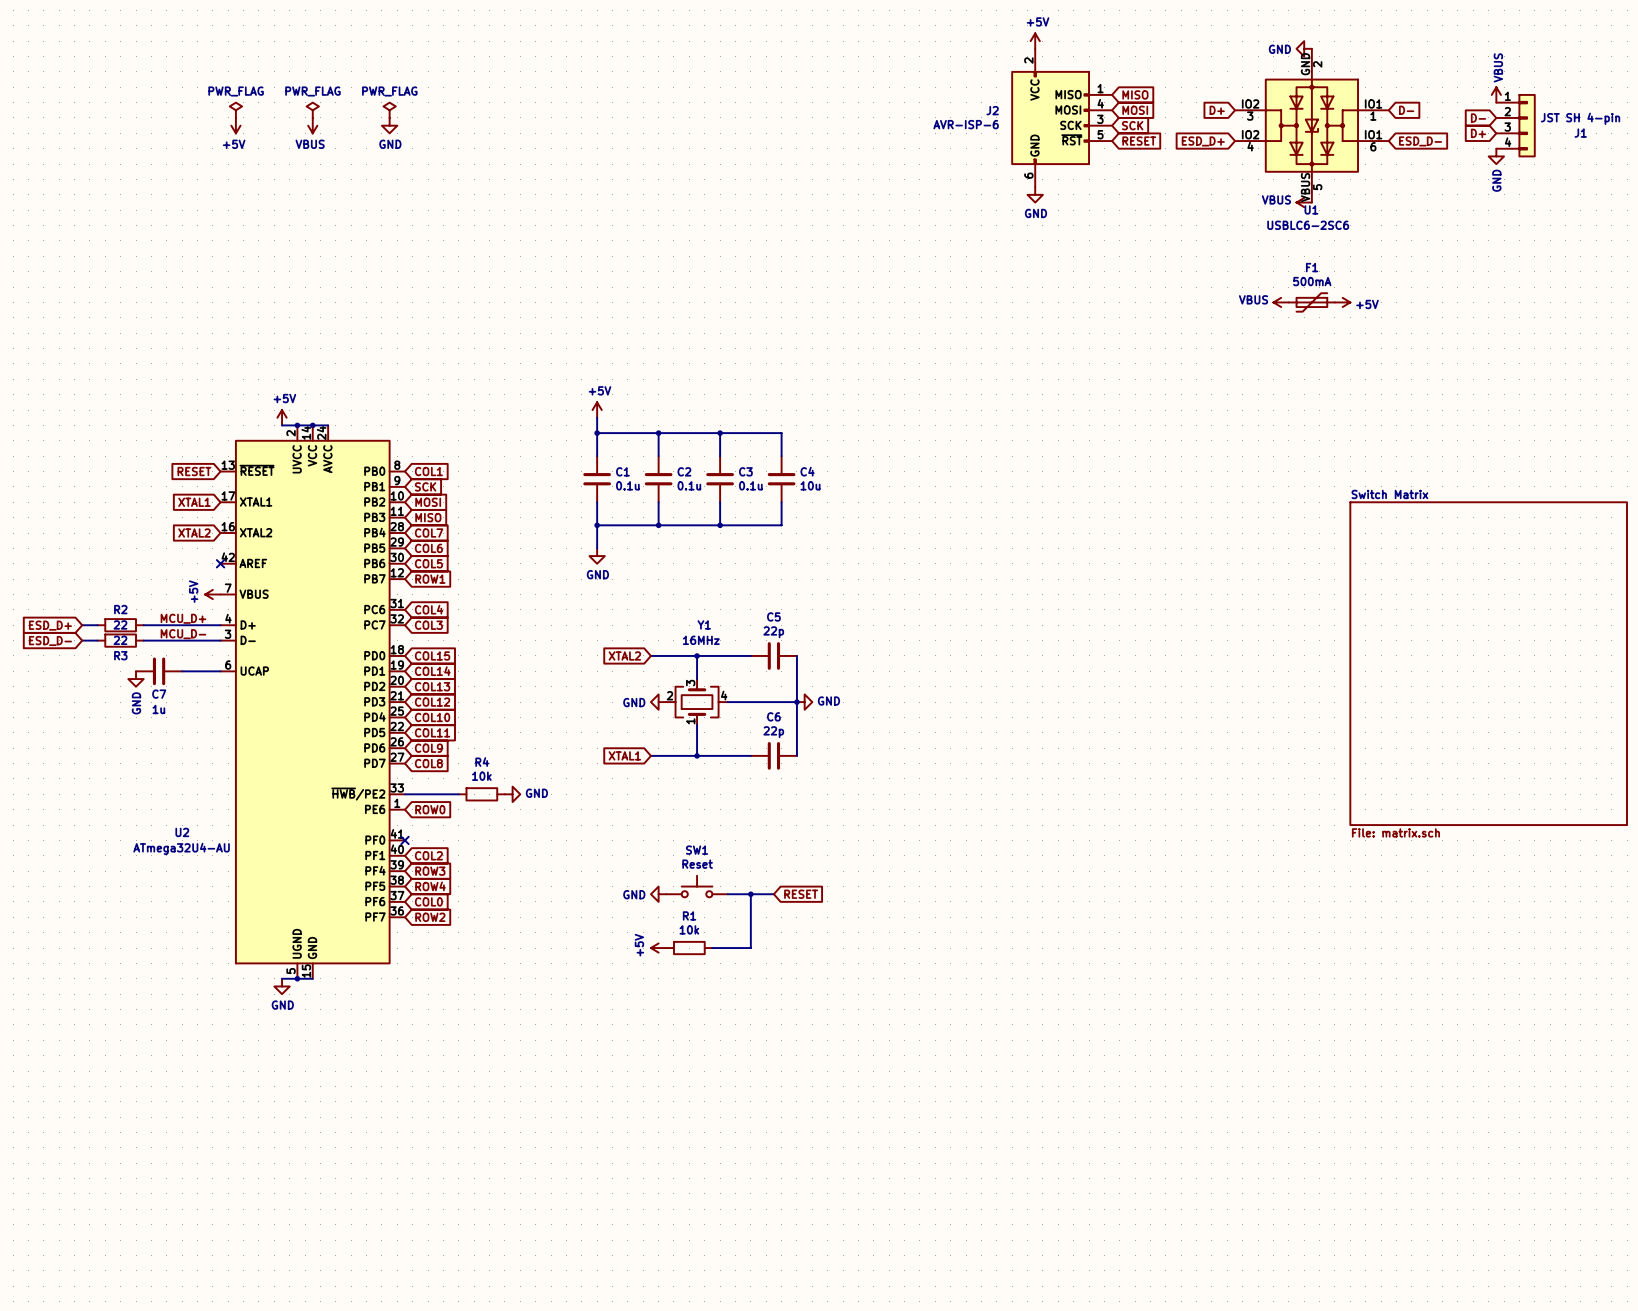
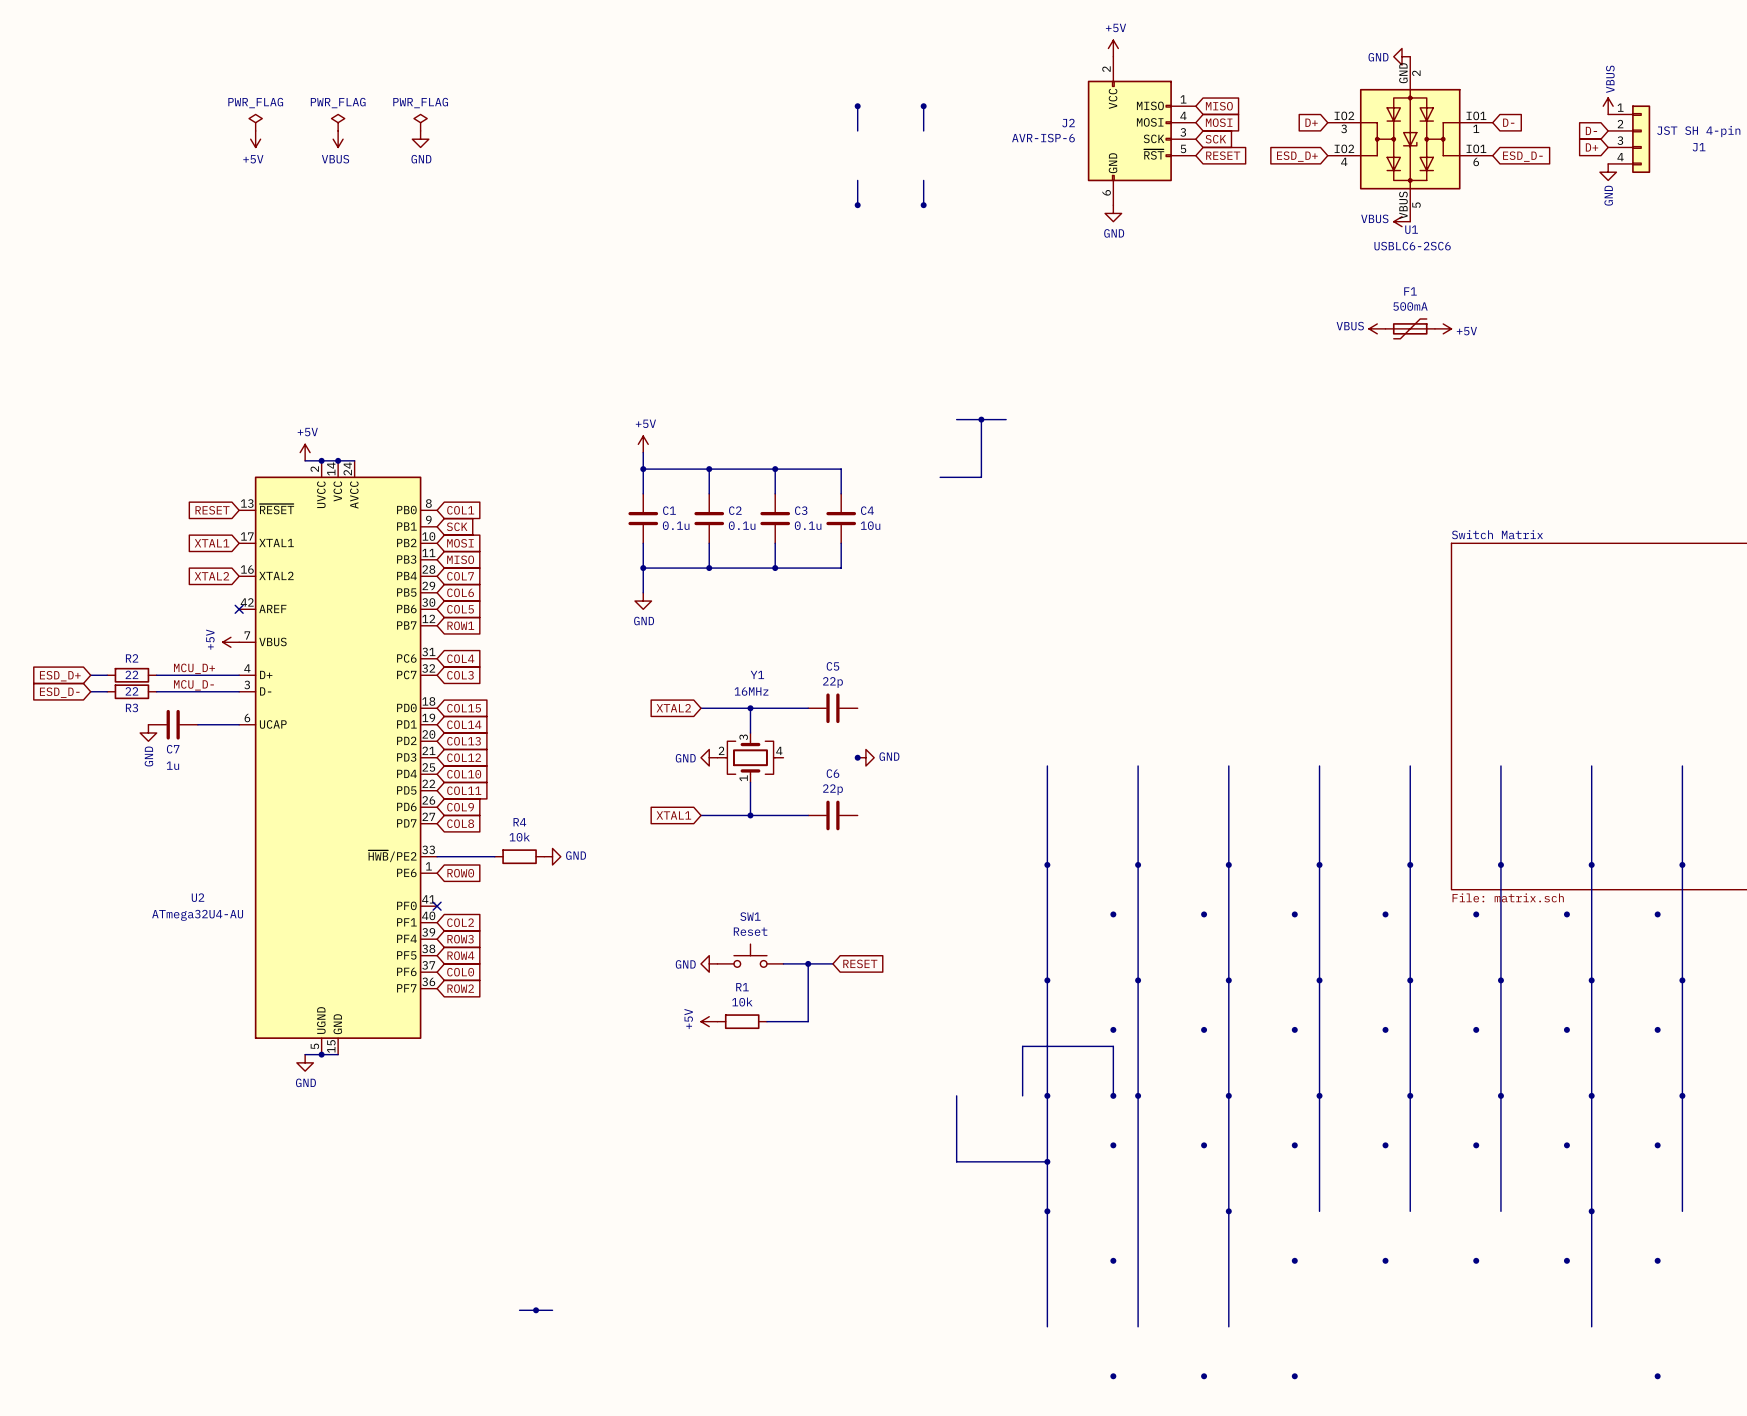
wire: none -> (857, 106) (857, 130)
junction: none -> (857, 106)
wire: none -> (923, 106) (923, 130)
junction: none -> (923, 106)
wire: none -> (857, 180) (857, 205)
wire: none -> (923, 180) (923, 205)
junction: none -> (857, 205)
junction: none -> (923, 205)
wire: none -> (956, 419) (1006, 419)
wire: none -> (981, 419) (981, 477) (940, 477)
junction: none -> (981, 419)
wire: (796, 655) (796, 755) -> none
wire: (727, 702) (796, 702) -> none
wire: none -> (1047, 765) (1047, 1326)
wire: none -> (1138, 765) (1138, 1326)
wire: none -> (1228, 765) (1228, 1326)
wire: none -> (1319, 765) (1319, 1211)
wire: none -> (1410, 765) (1410, 1211)
wire: none -> (1500, 765) (1500, 1211)
wire: none -> (1591, 765) (1591, 1326)
wire: none -> (1682, 765) (1682, 1211)
junction: none -> (1047, 864)
junction: none -> (1138, 864)
junction: none -> (1228, 864)
junction: none -> (1319, 864)
junction: none -> (1410, 864)
junction: none -> (1500, 864)
junction: none -> (1591, 864)
junction: none -> (1682, 864)
junction: none -> (1113, 914)
junction: none -> (1204, 914)
junction: none -> (1294, 914)
junction: none -> (1385, 914)
junction: none -> (1476, 914)
junction: none -> (1566, 914)
junction: none -> (1657, 914)
junction: none -> (1047, 980)
junction: none -> (1138, 980)
junction: none -> (1228, 980)
junction: none -> (1319, 980)
junction: none -> (1410, 980)
junction: none -> (1500, 980)
junction: none -> (1591, 980)
junction: none -> (1682, 980)
junction: none -> (1113, 1029)
junction: none -> (1204, 1029)
junction: none -> (1294, 1029)
junction: none -> (1385, 1029)
junction: none -> (1476, 1029)
junction: none -> (1566, 1029)
junction: none -> (1657, 1029)
wire: none -> (956, 1095) (956, 1161) (1047, 1161)
wire: none -> (1022, 1095) (1022, 1046) (1113, 1046) (1113, 1095)
junction: none -> (1047, 1095)
junction: none -> (1113, 1095)
junction: none -> (1138, 1095)
junction: none -> (1228, 1095)
junction: none -> (1319, 1095)
junction: none -> (1410, 1095)
junction: none -> (1500, 1095)
junction: none -> (1591, 1095)
junction: none -> (1682, 1095)
junction: none -> (1113, 1145)
junction: none -> (1204, 1145)
junction: none -> (1294, 1145)
junction: none -> (1385, 1145)
junction: none -> (1476, 1145)
junction: none -> (1566, 1145)
junction: none -> (1657, 1145)
junction: none -> (1047, 1161)
junction: none -> (1047, 1211)
junction: none -> (1228, 1211)
junction: none -> (1591, 1211)
junction: none -> (1113, 1260)
junction: none -> (1294, 1260)
junction: none -> (1385, 1260)
junction: none -> (1476, 1260)
junction: none -> (1566, 1260)
junction: none -> (1657, 1260)
wire: none -> (519, 1310) (552, 1310)
junction: none -> (536, 1310)
junction: none -> (1113, 1376)
junction: none -> (1204, 1376)
junction: none -> (1294, 1376)
junction: none -> (1657, 1376)

